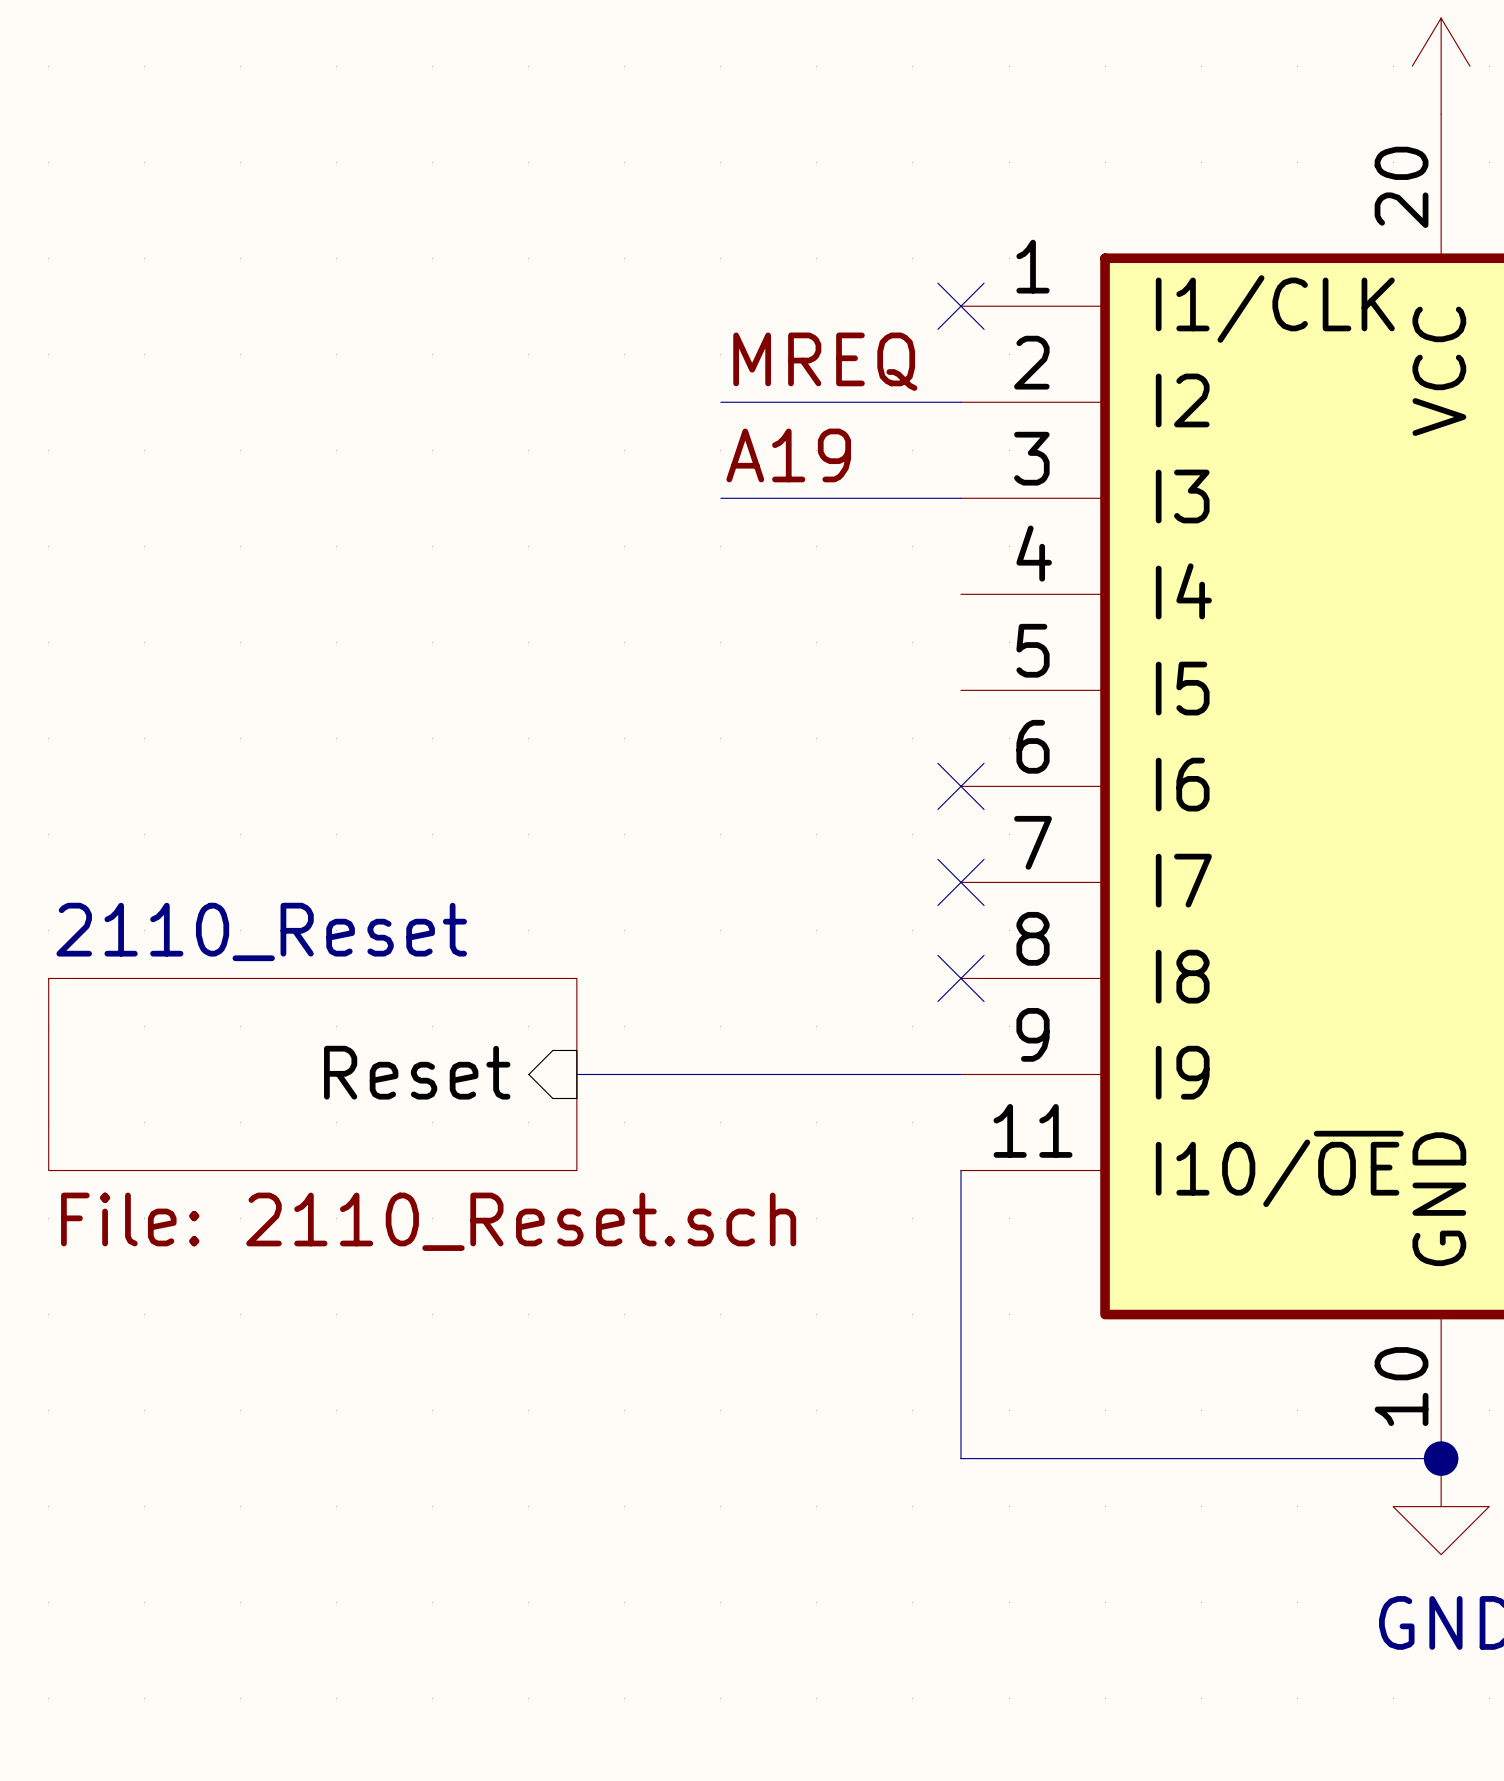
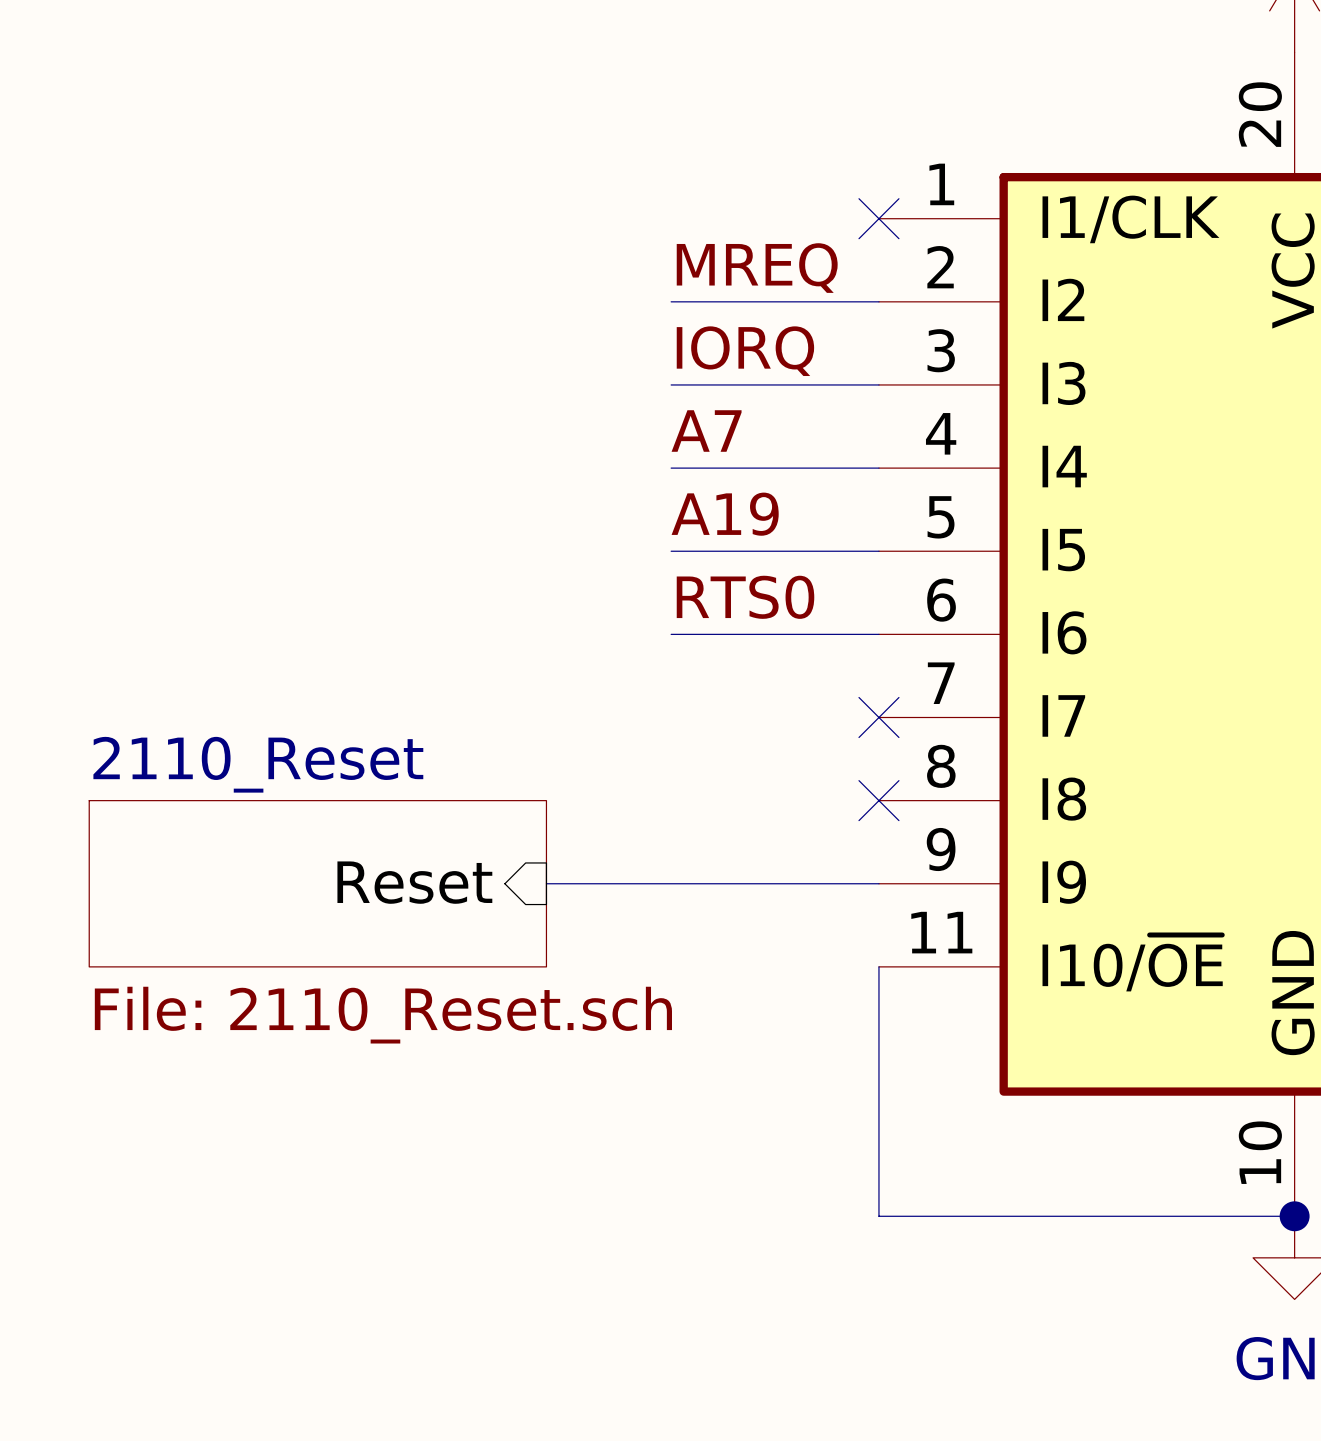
label: A19 (788, 455) -> IORQ (745, 351)
label: none -> A7 (706, 431)
wire: none -> (671, 468) (878, 468)
label: none -> A19 (725, 514)
wire: none -> (671, 551) (878, 551)
label: none -> RTS0 (745, 597)
wire: none -> (671, 634) (878, 634)
no-connect mark: (960, 786) -> none

